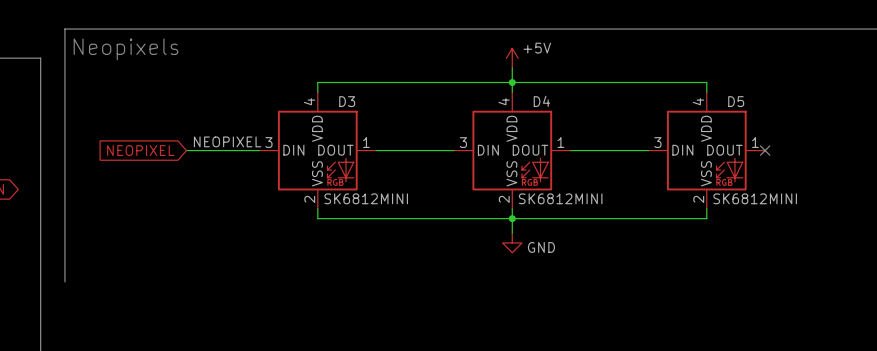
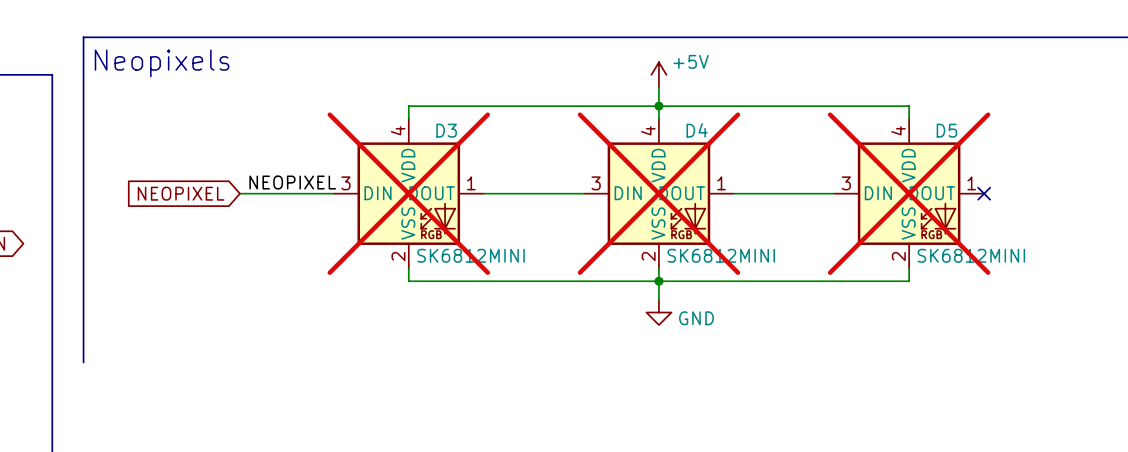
D3 do-not-place cross: none -> (408, 193)
D4 do-not-place cross: none -> (658, 193)
D5 do-not-place cross: none -> (909, 193)

